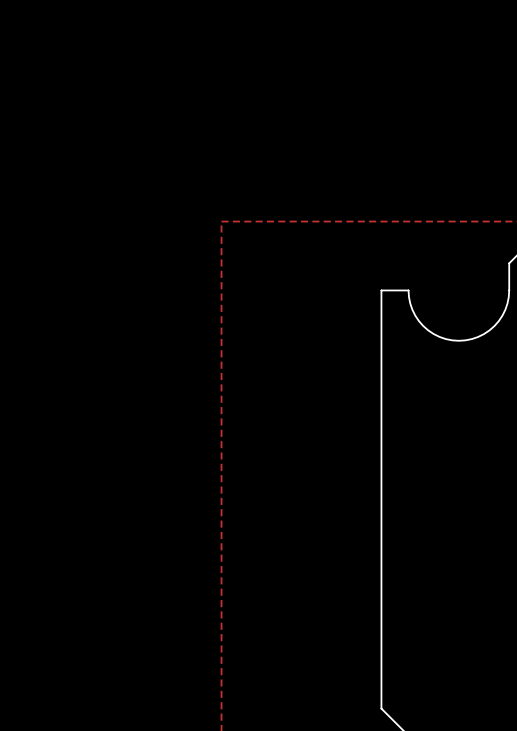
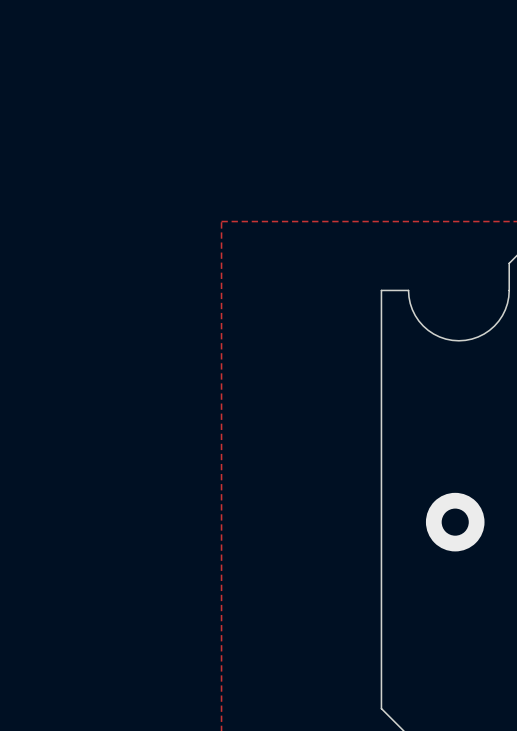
via: none -> (455, 522)

